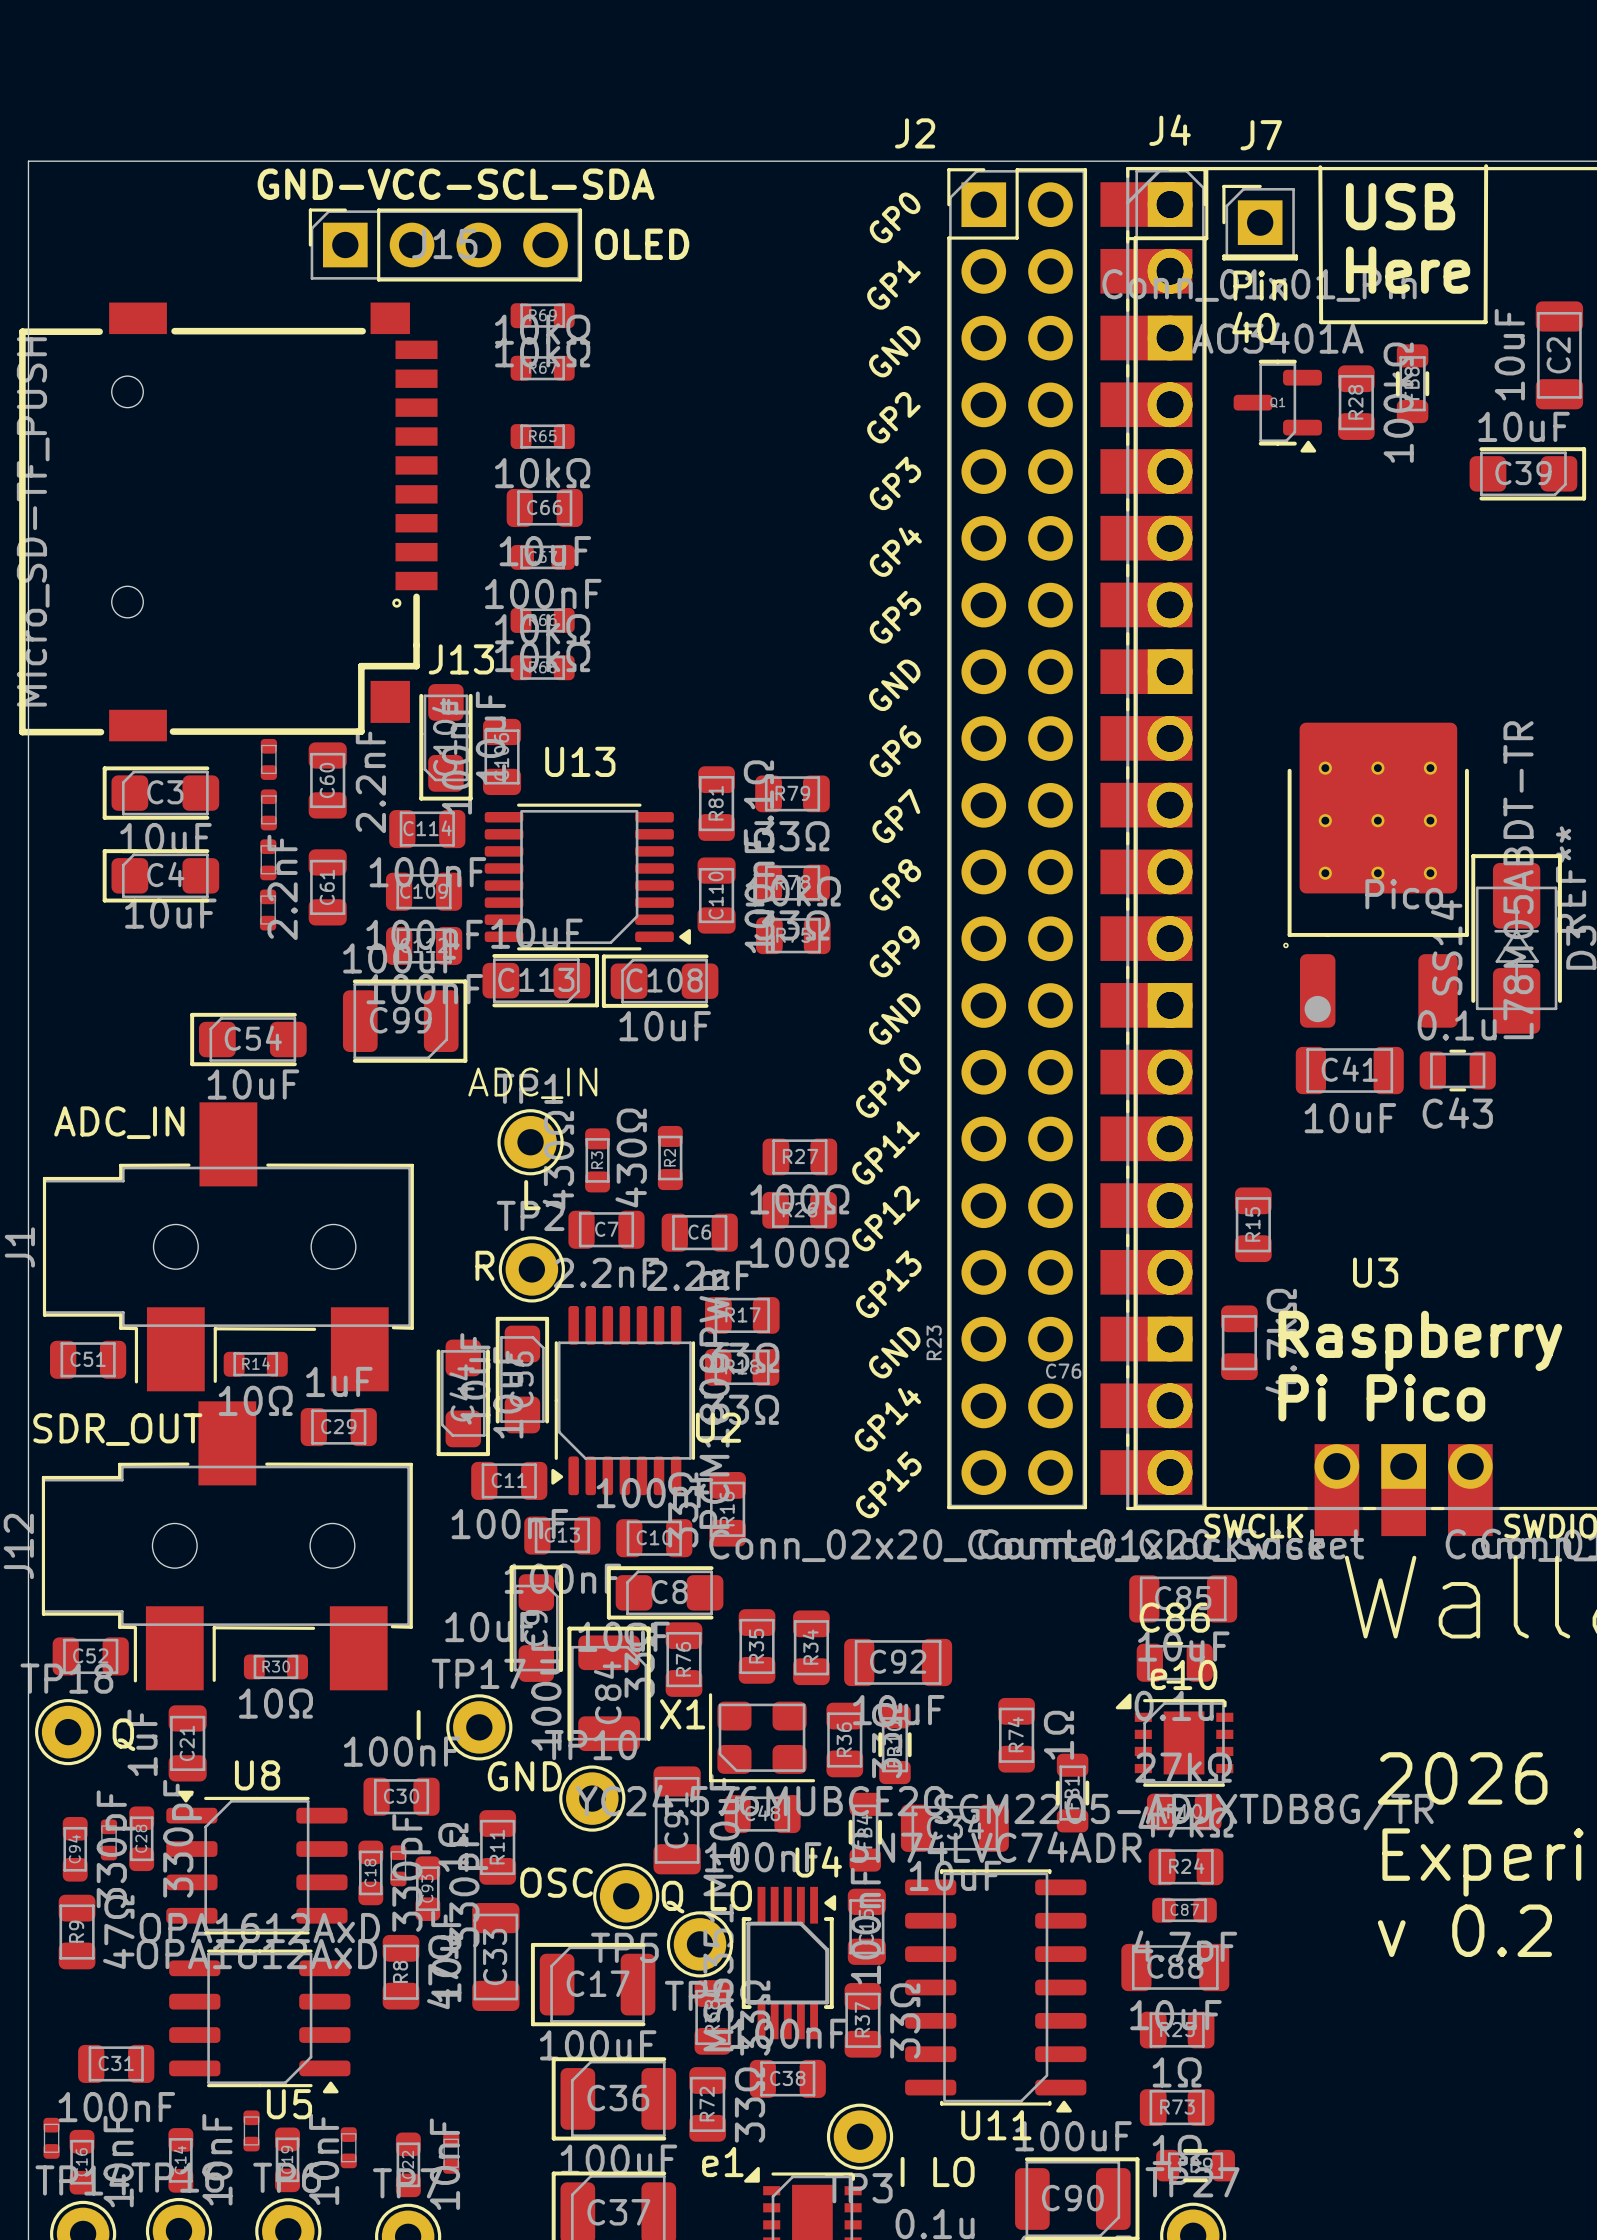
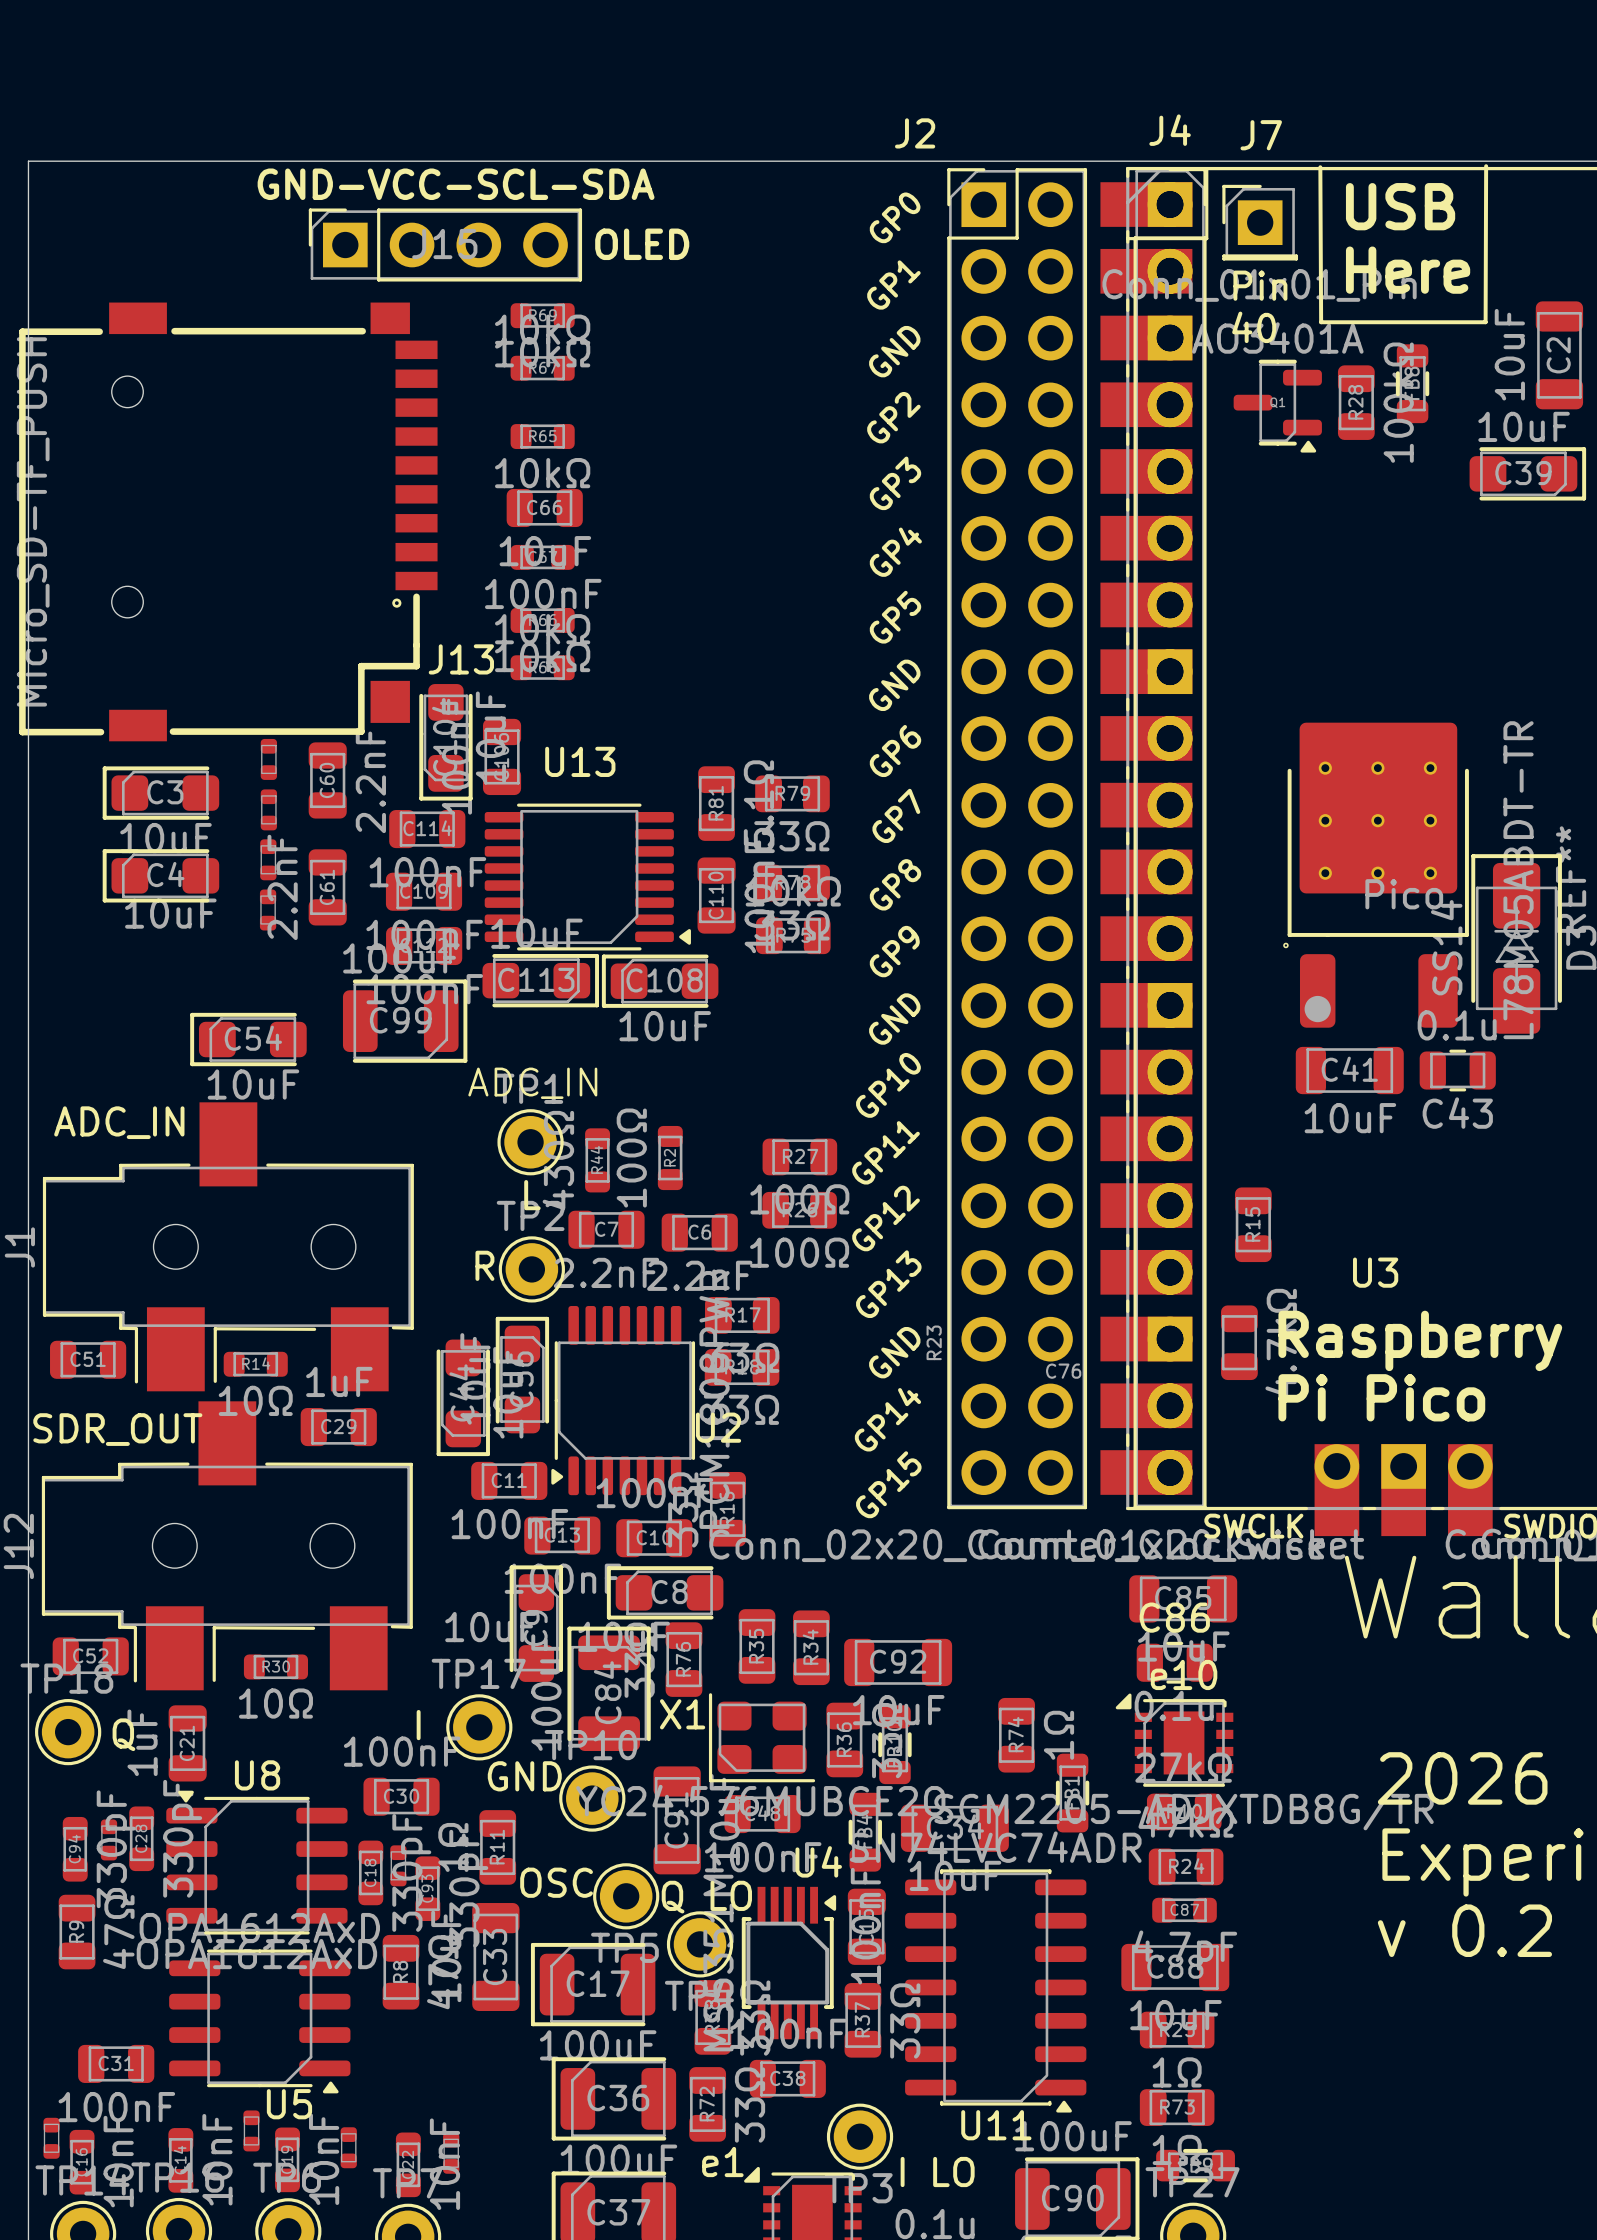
R2 value: 430Ω (631, 1158) -> 100Ω (631, 1158)
R3 name: R3 (597, 1160) -> R44 (596, 1159)

